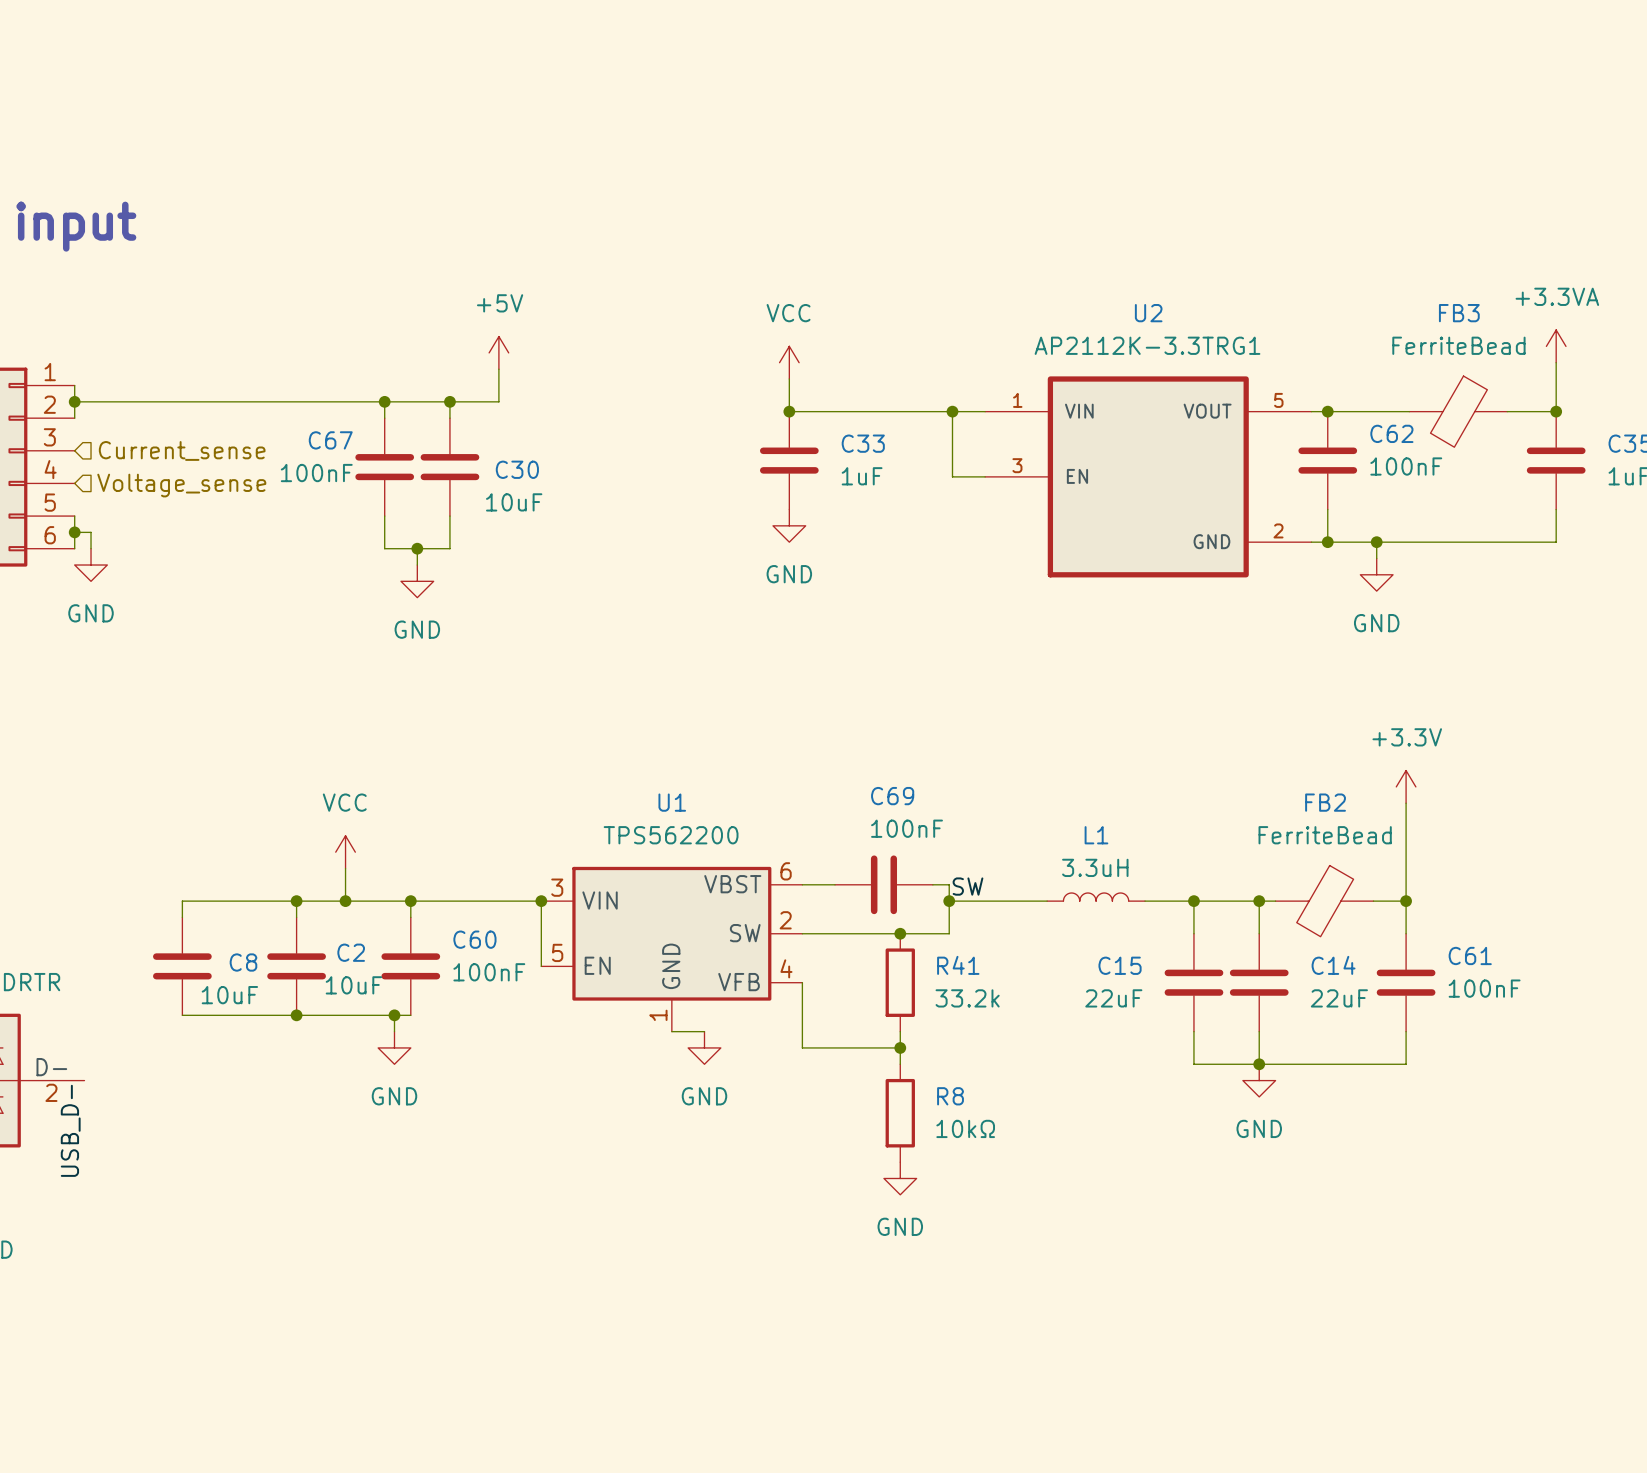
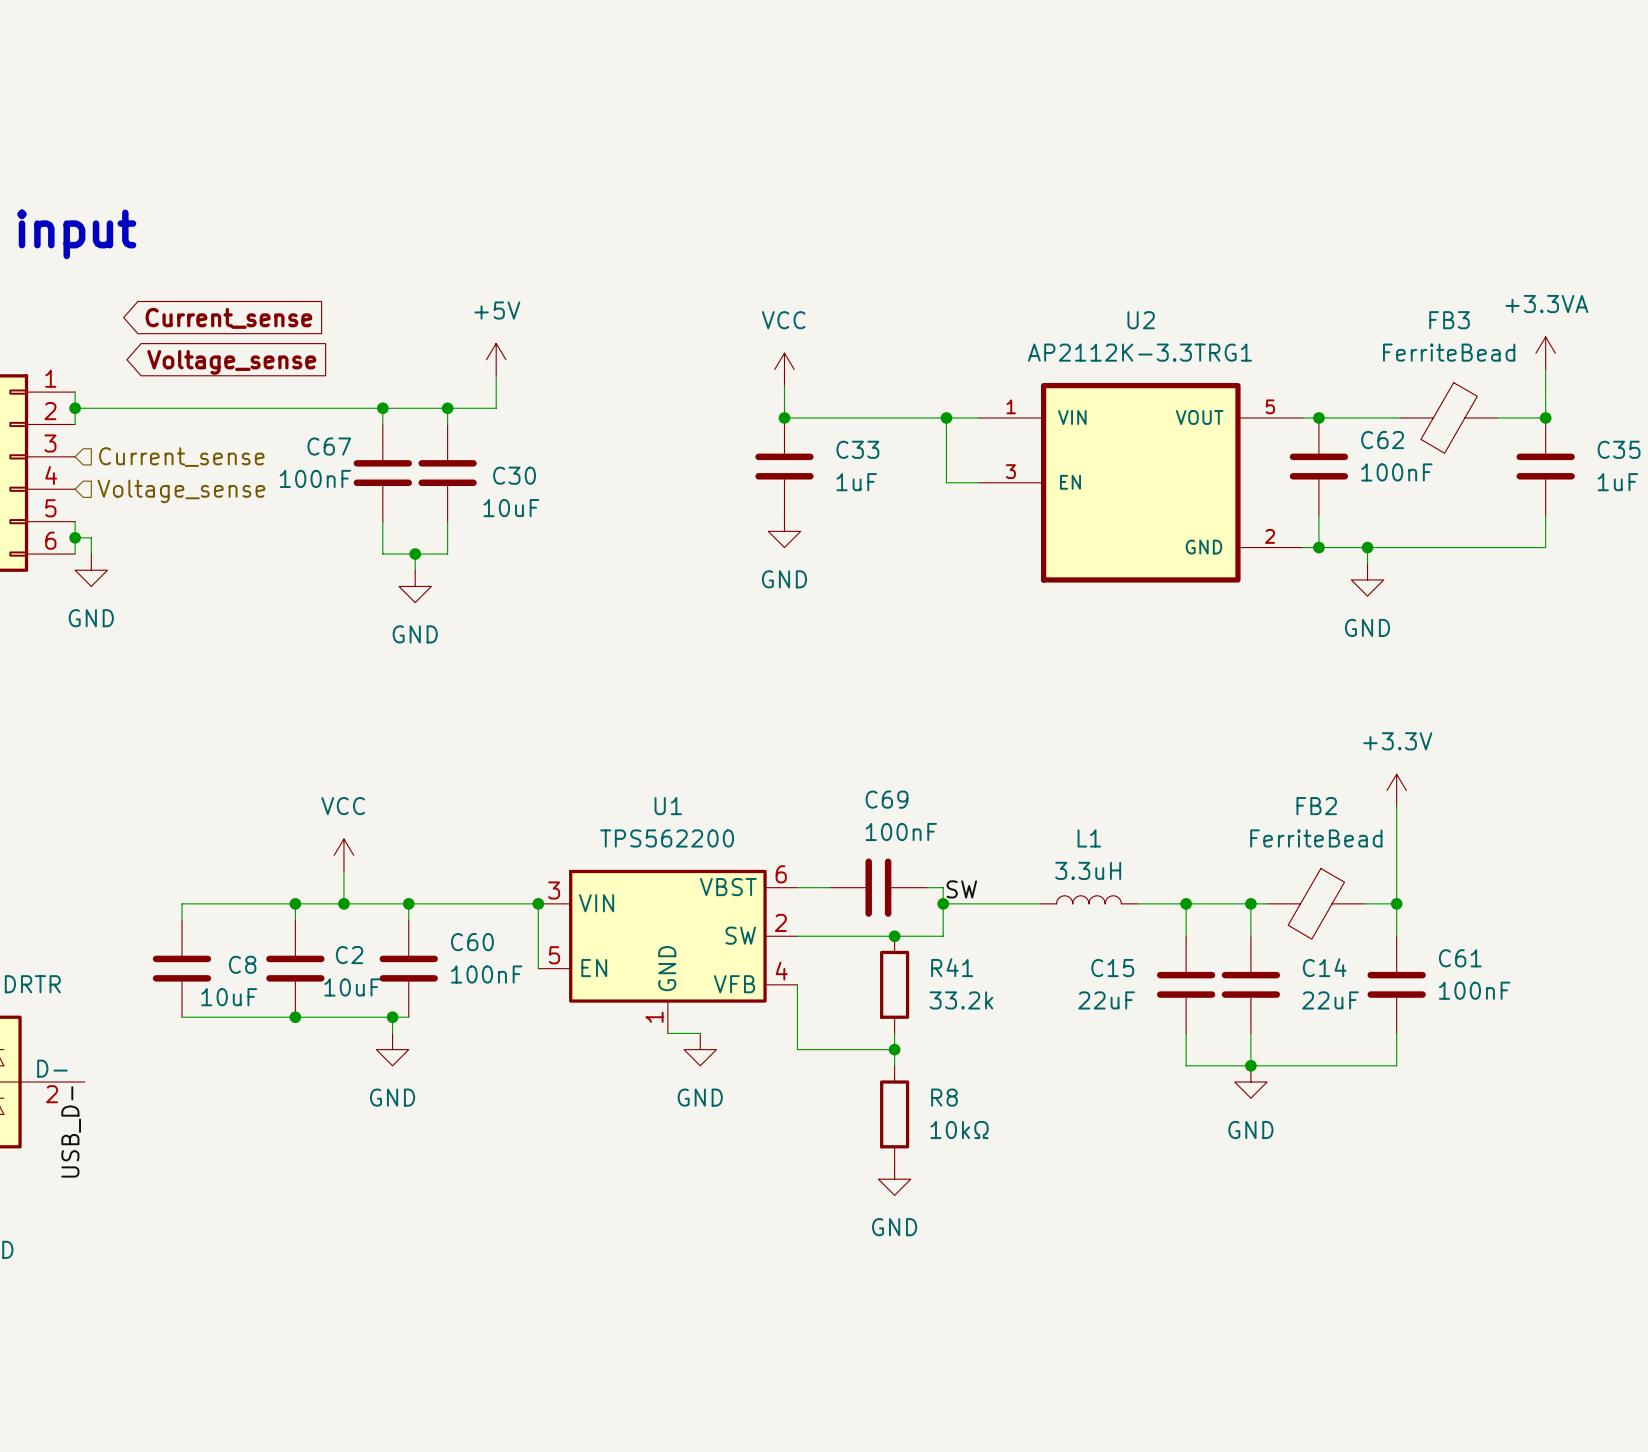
global label: none -> Current_sense (228, 318)
global label: none -> Voltage_sense (231, 362)

